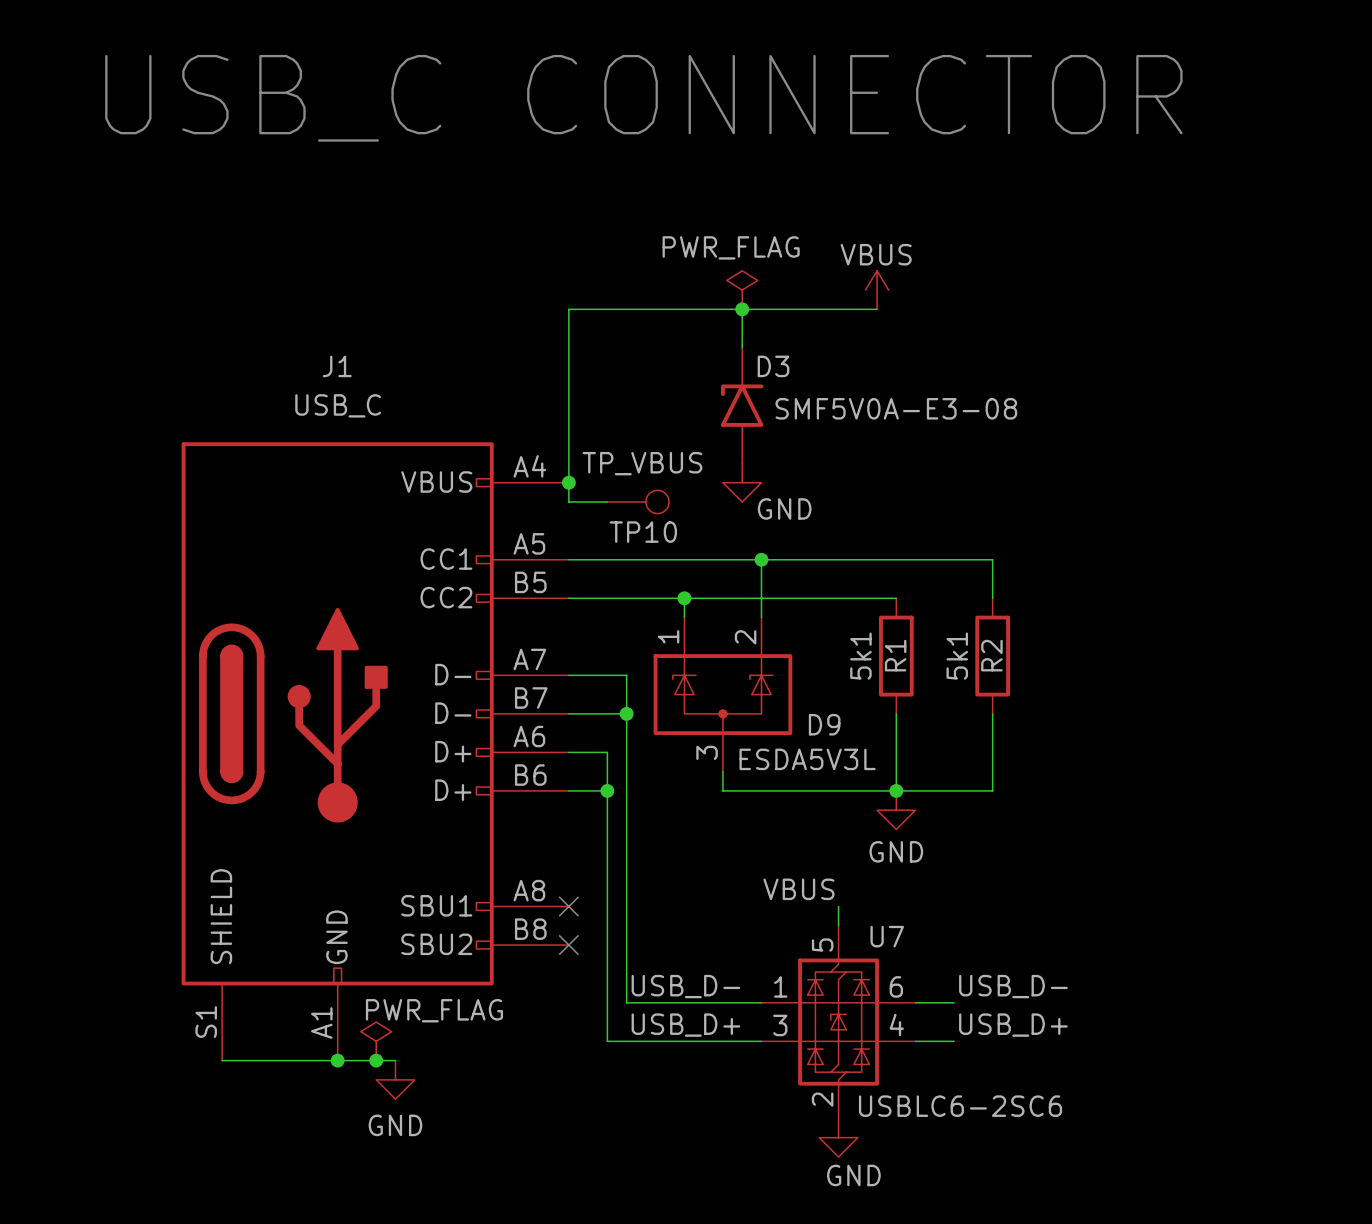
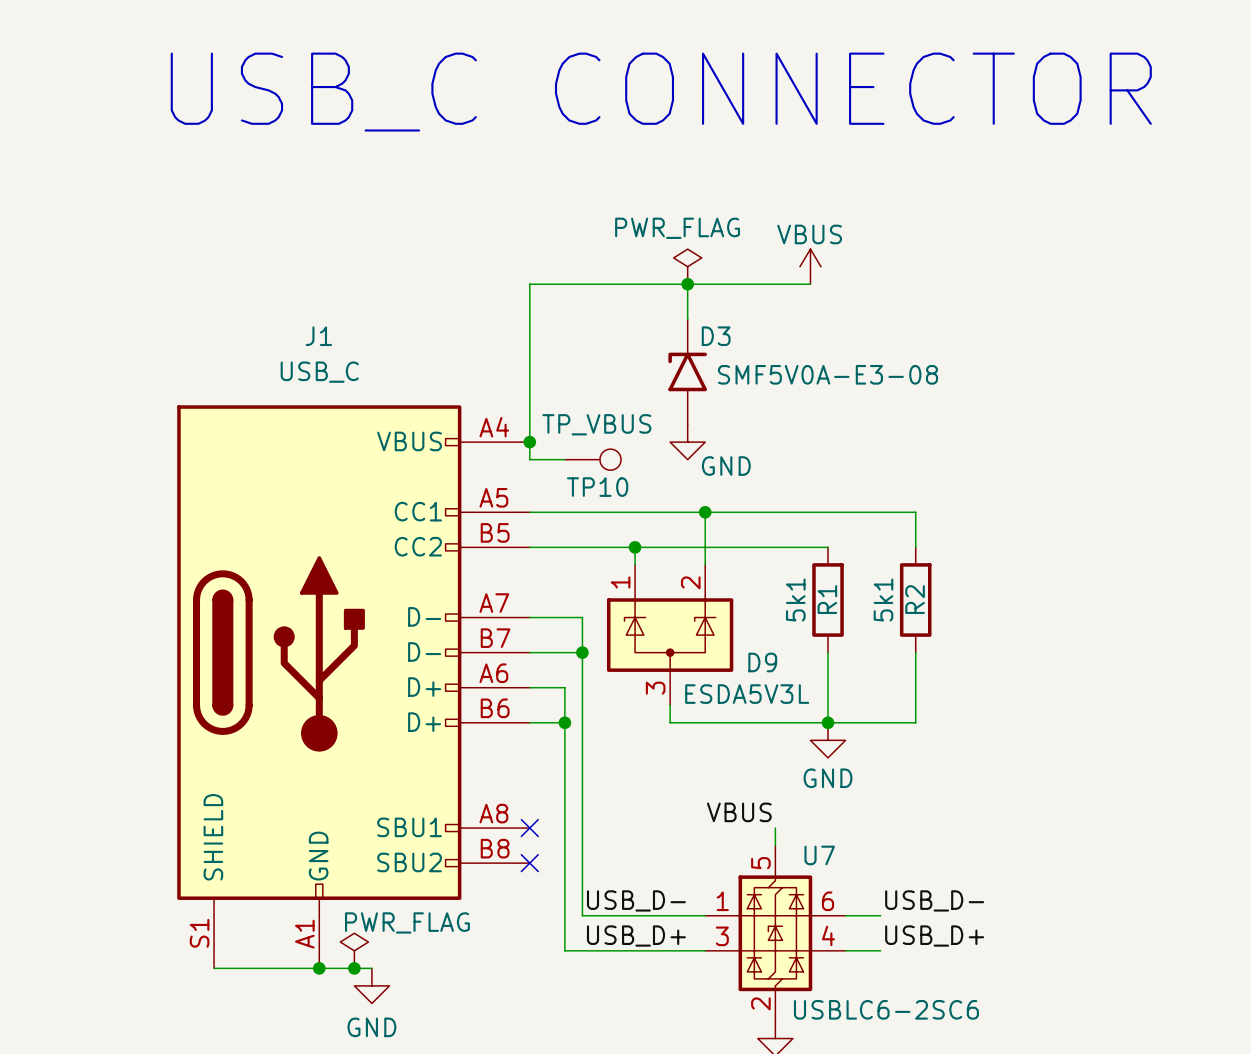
text position: USB_C CONNECTOR (643, 98) -> USB_C CONNECTOR (661, 92)

